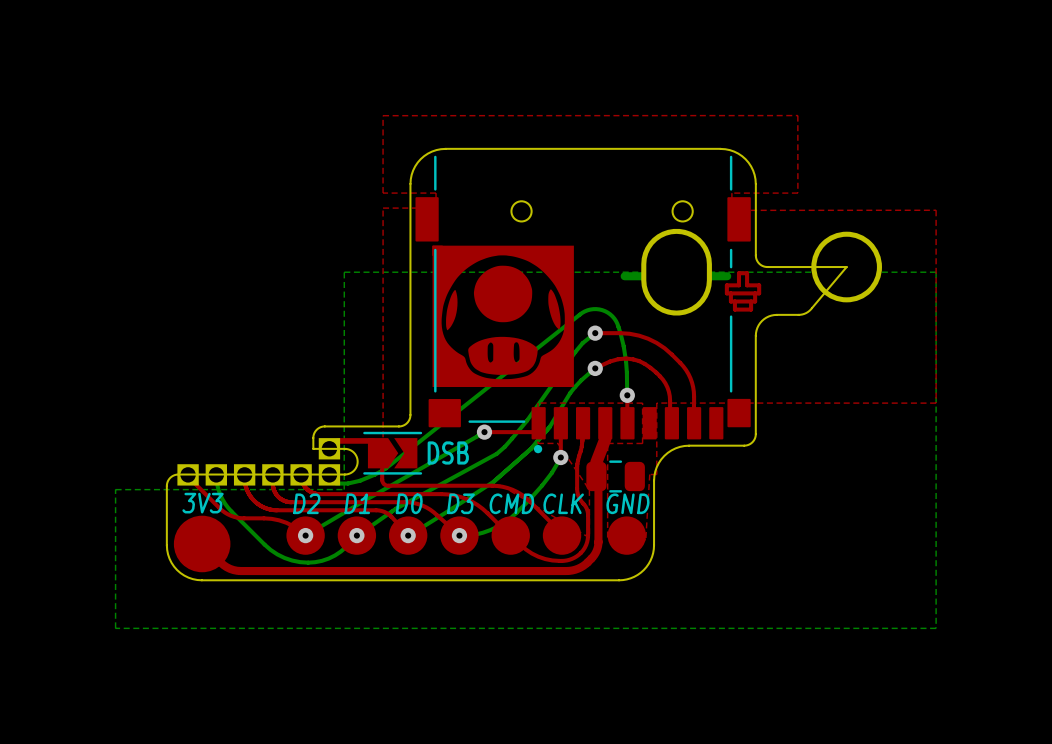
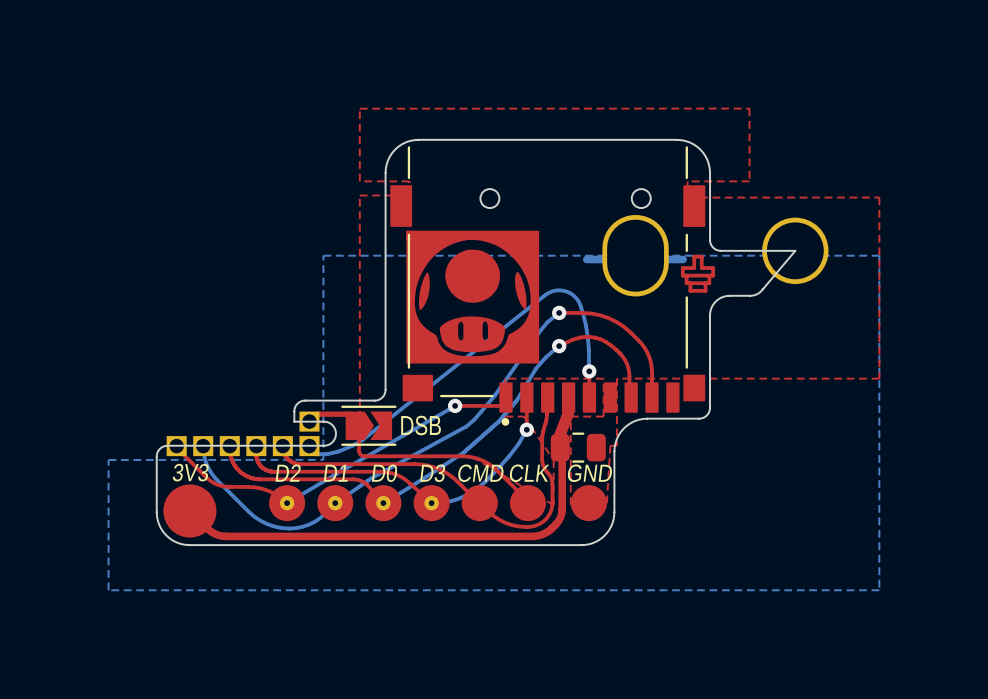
part footprint: [286, 516, 325, 555] -> [269, 485, 306, 522]
part footprint: [337, 516, 377, 555] -> [317, 485, 354, 522]
part footprint: [388, 516, 428, 555] -> [365, 485, 402, 522]
part footprint: [440, 516, 479, 555] -> [413, 485, 450, 522]
via: (305, 535) -> none
via: (356, 535) -> none
via: (408, 535) -> none
via: (459, 535) -> none

